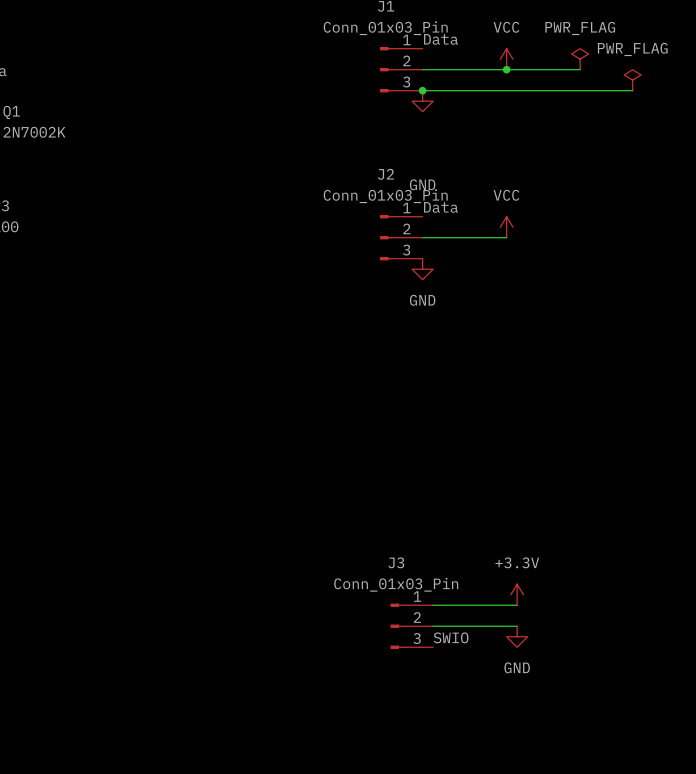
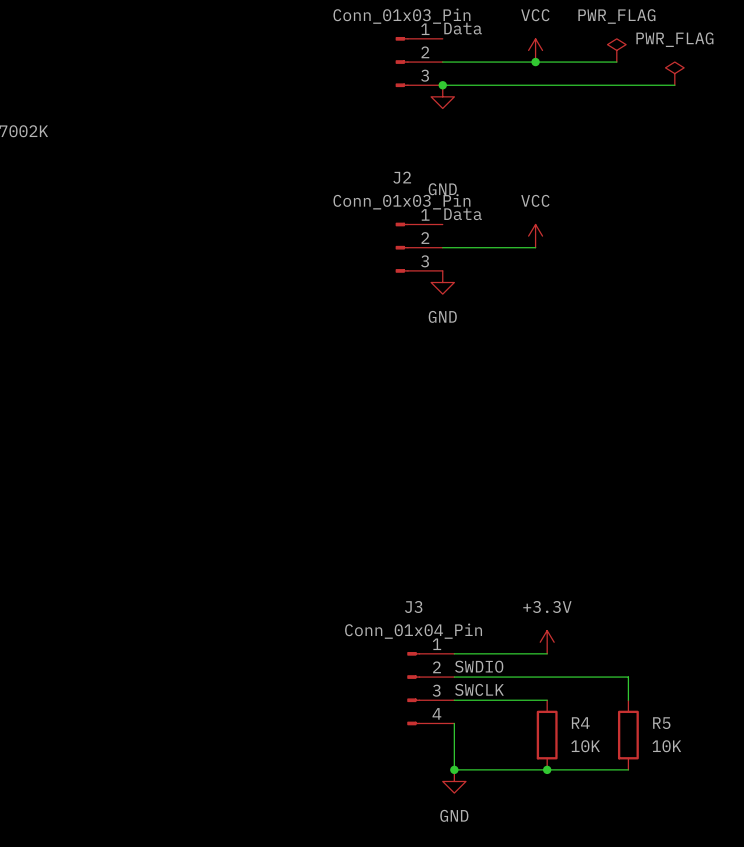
J3 value: Conn_01x03_Pin (396, 584) -> Conn_01x04_Pin (413, 631)
J3 symbol: [390, 603, 434, 649] -> [407, 651, 455, 726]
label: none -> SWDIO (479, 666)
wire: none -> (547, 677) (628, 677) (628, 700)
power symbol position: GND (517, 636) -> GND (454, 781)
label: SWIO (451, 637) -> SWCLK (479, 689)
wire: none -> (454, 700) (547, 700)
wire: none -> (454, 723) (454, 769) (628, 769)
R4: none -> 10K (547, 735)
R5: none -> 10K (628, 735)
junction: none -> (454, 769)
junction: none -> (547, 769)

